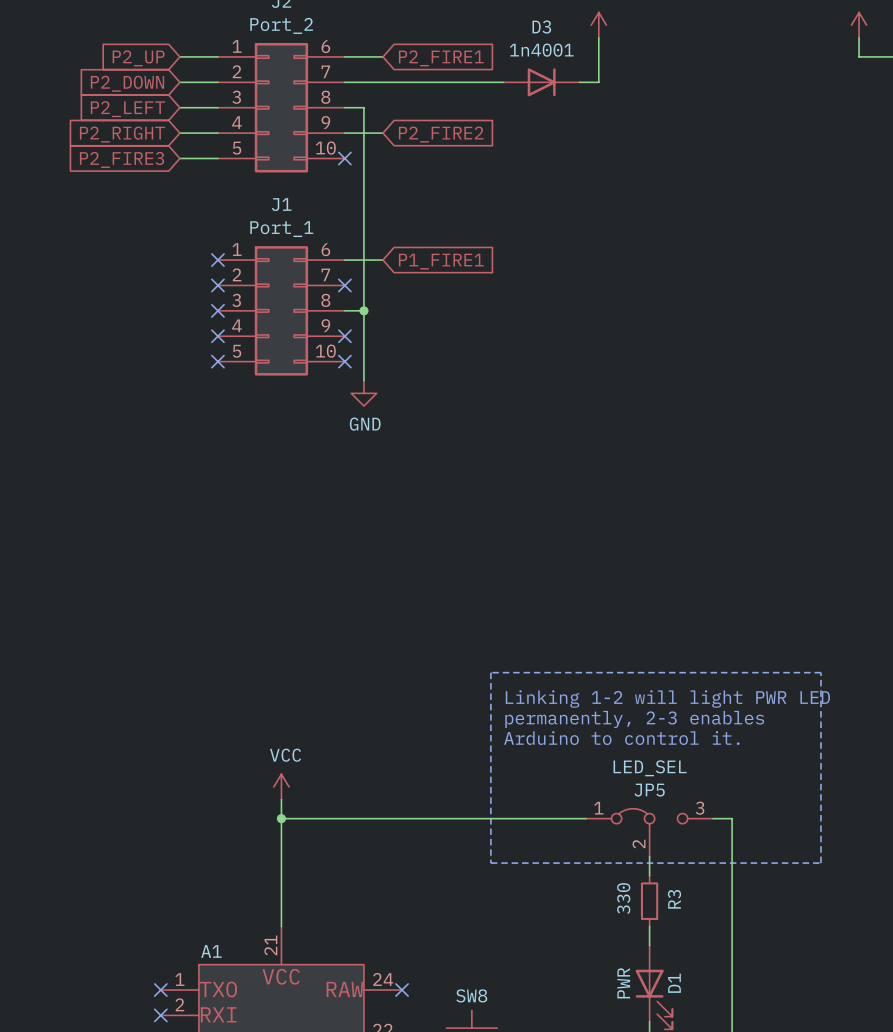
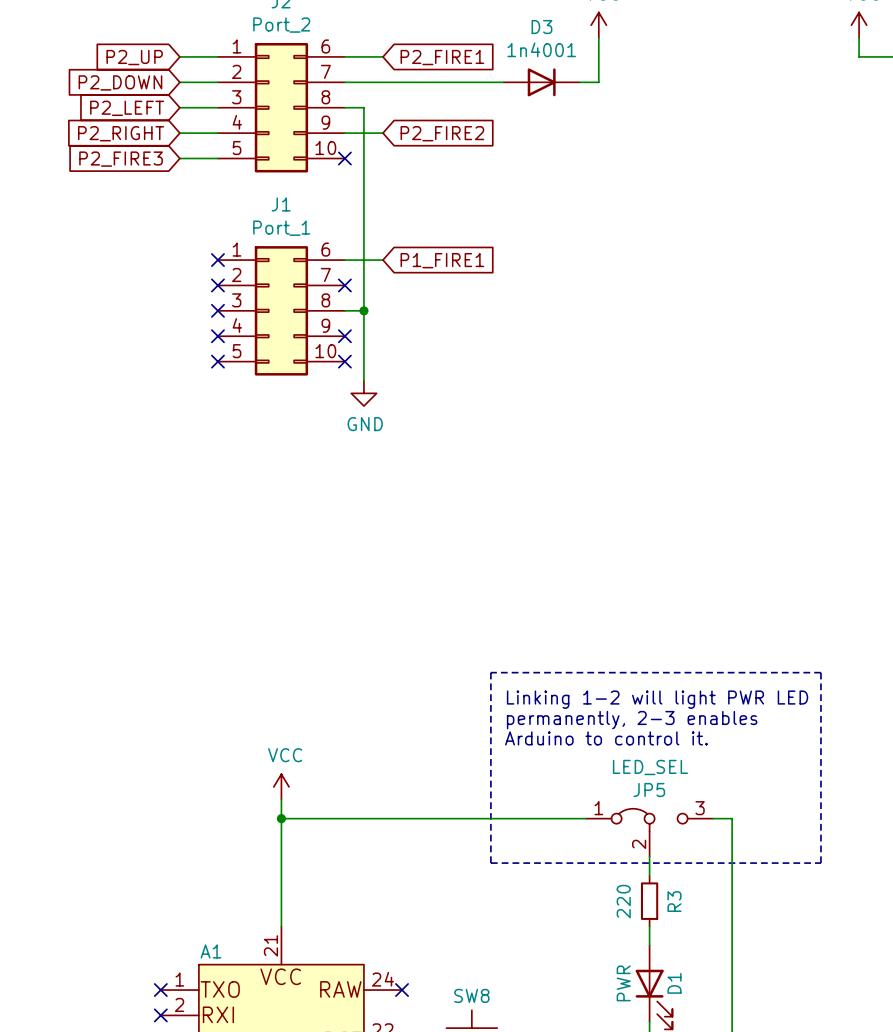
R3 value: 330 (623, 898) -> 220 (623, 901)

